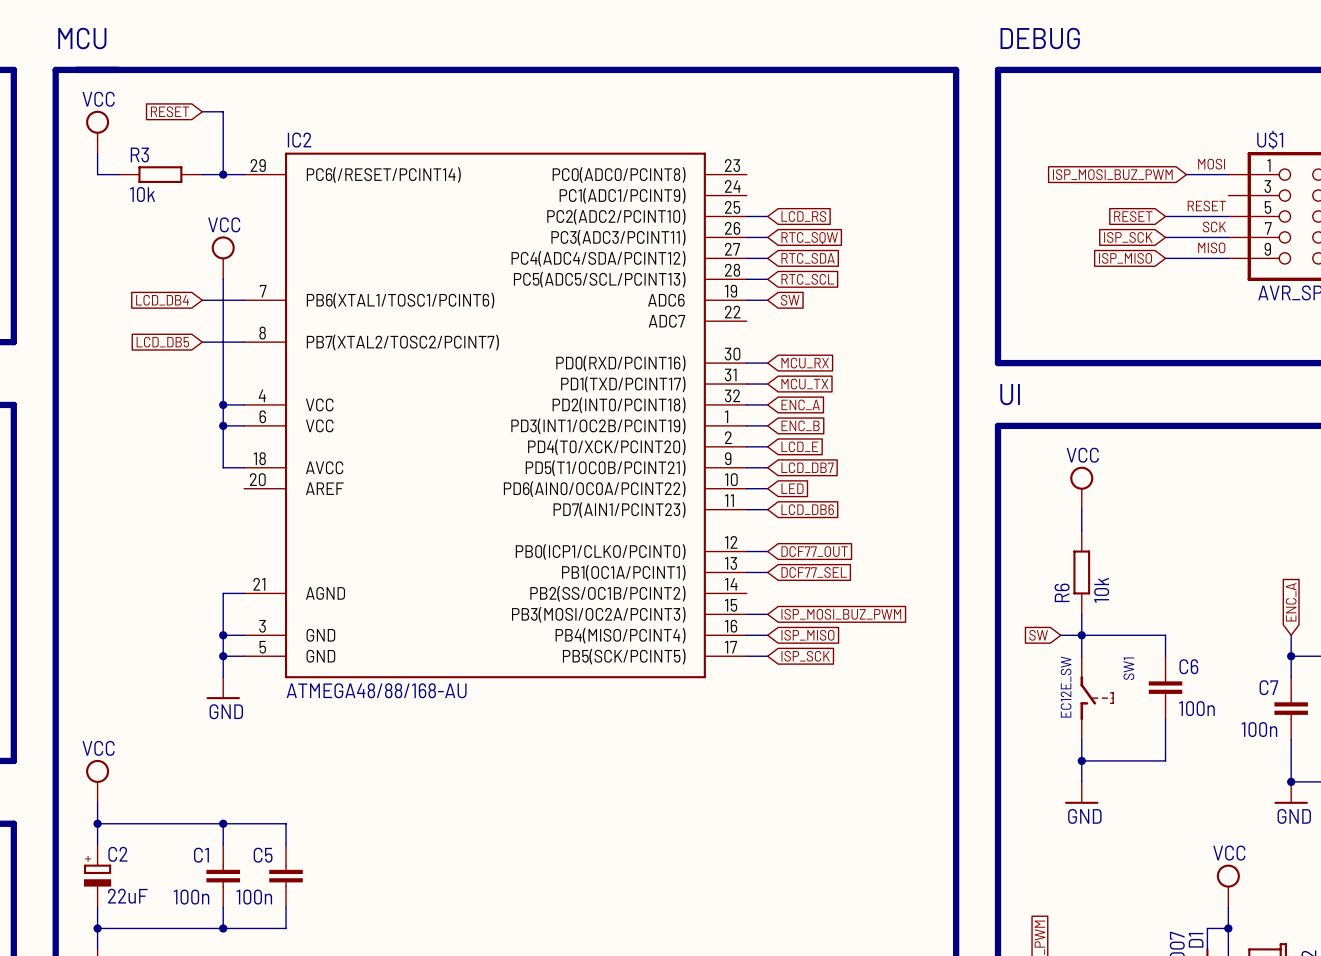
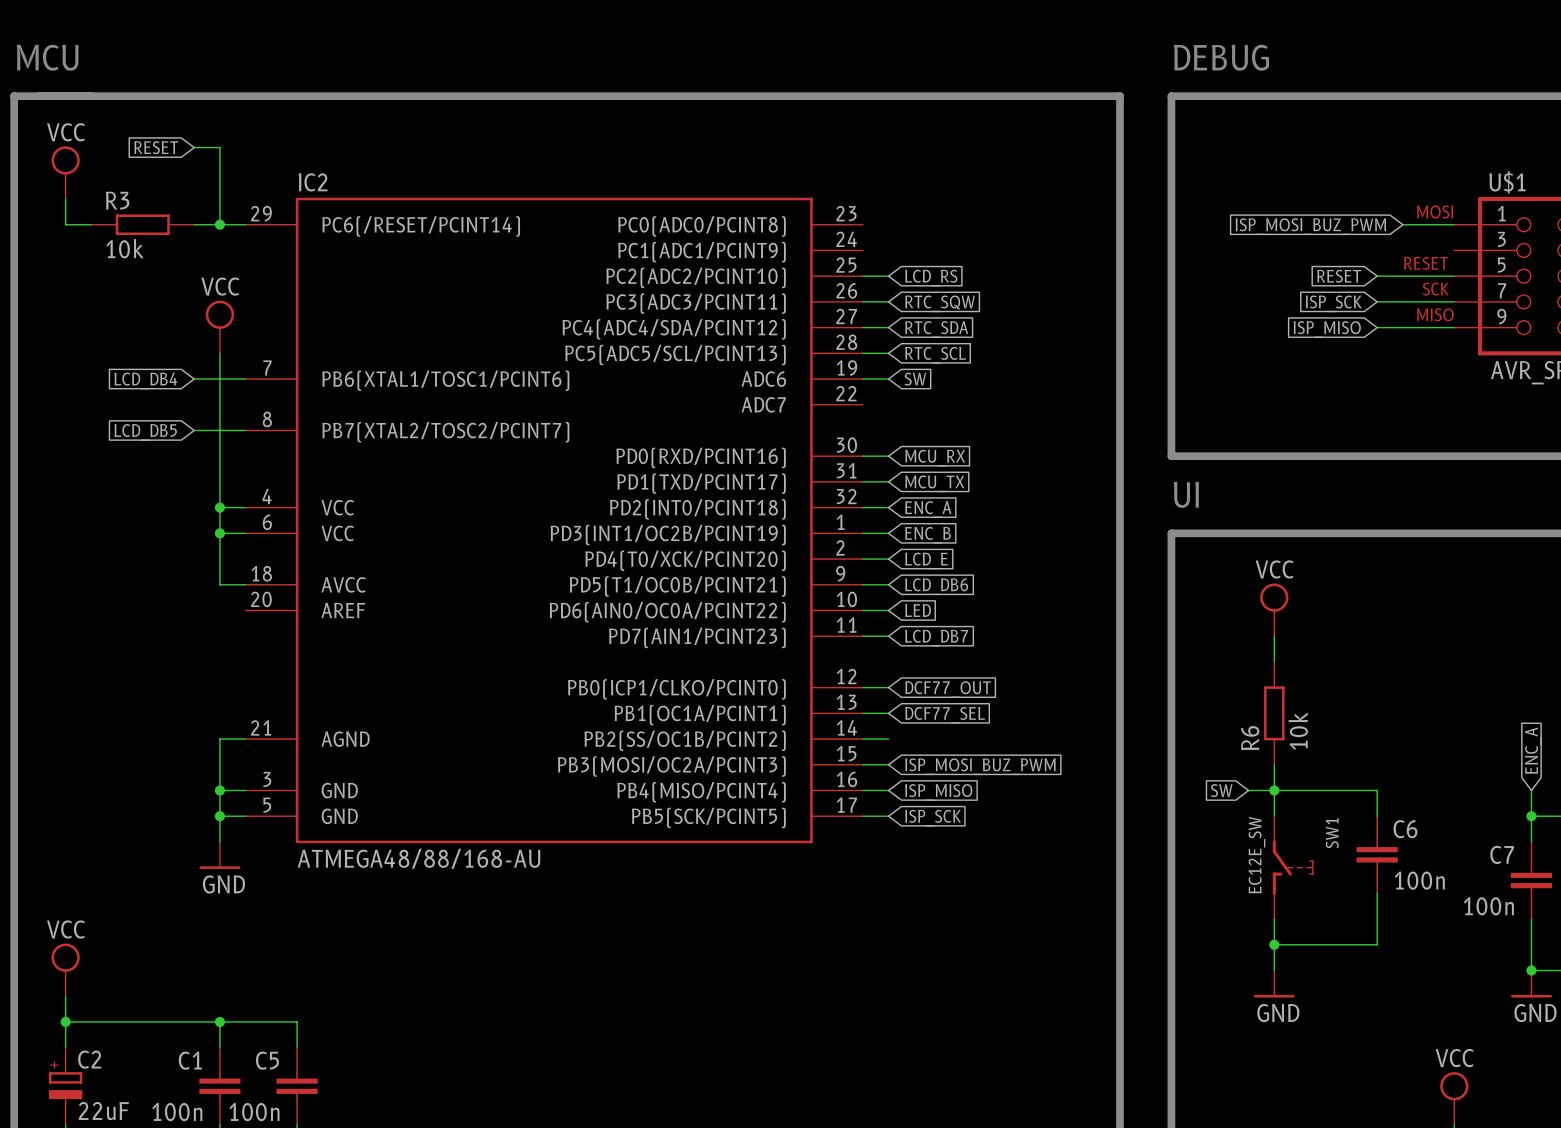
global label: LCD_DB7 (807, 467) -> LCD_DB6 (936, 586)
global label: LCD_DB6 (807, 509) -> LCD_DB7 (936, 638)
wire: none -> (862, 739) (888, 739)

